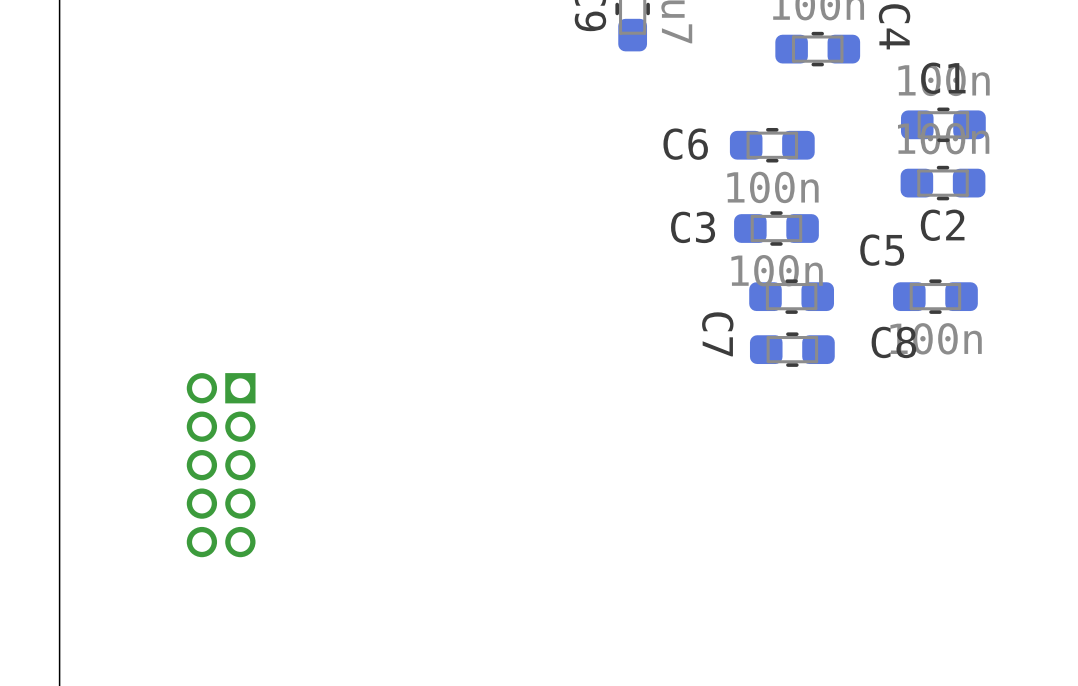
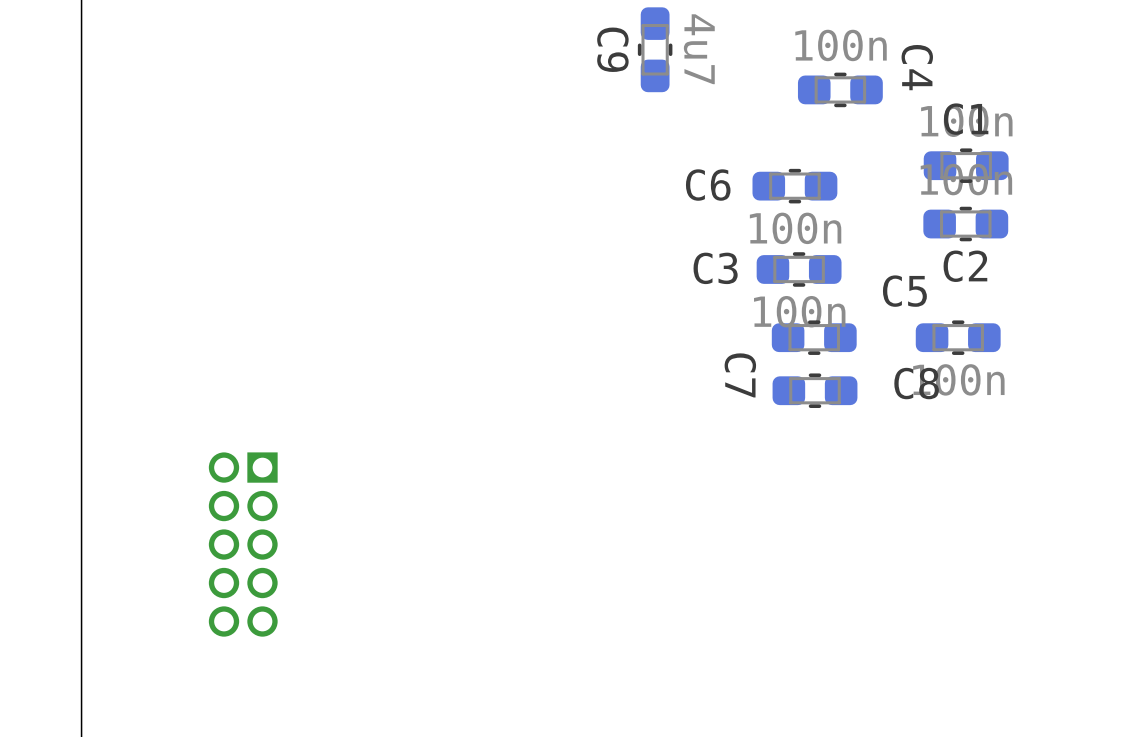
part position: (221, 465) -> (243, 544)

